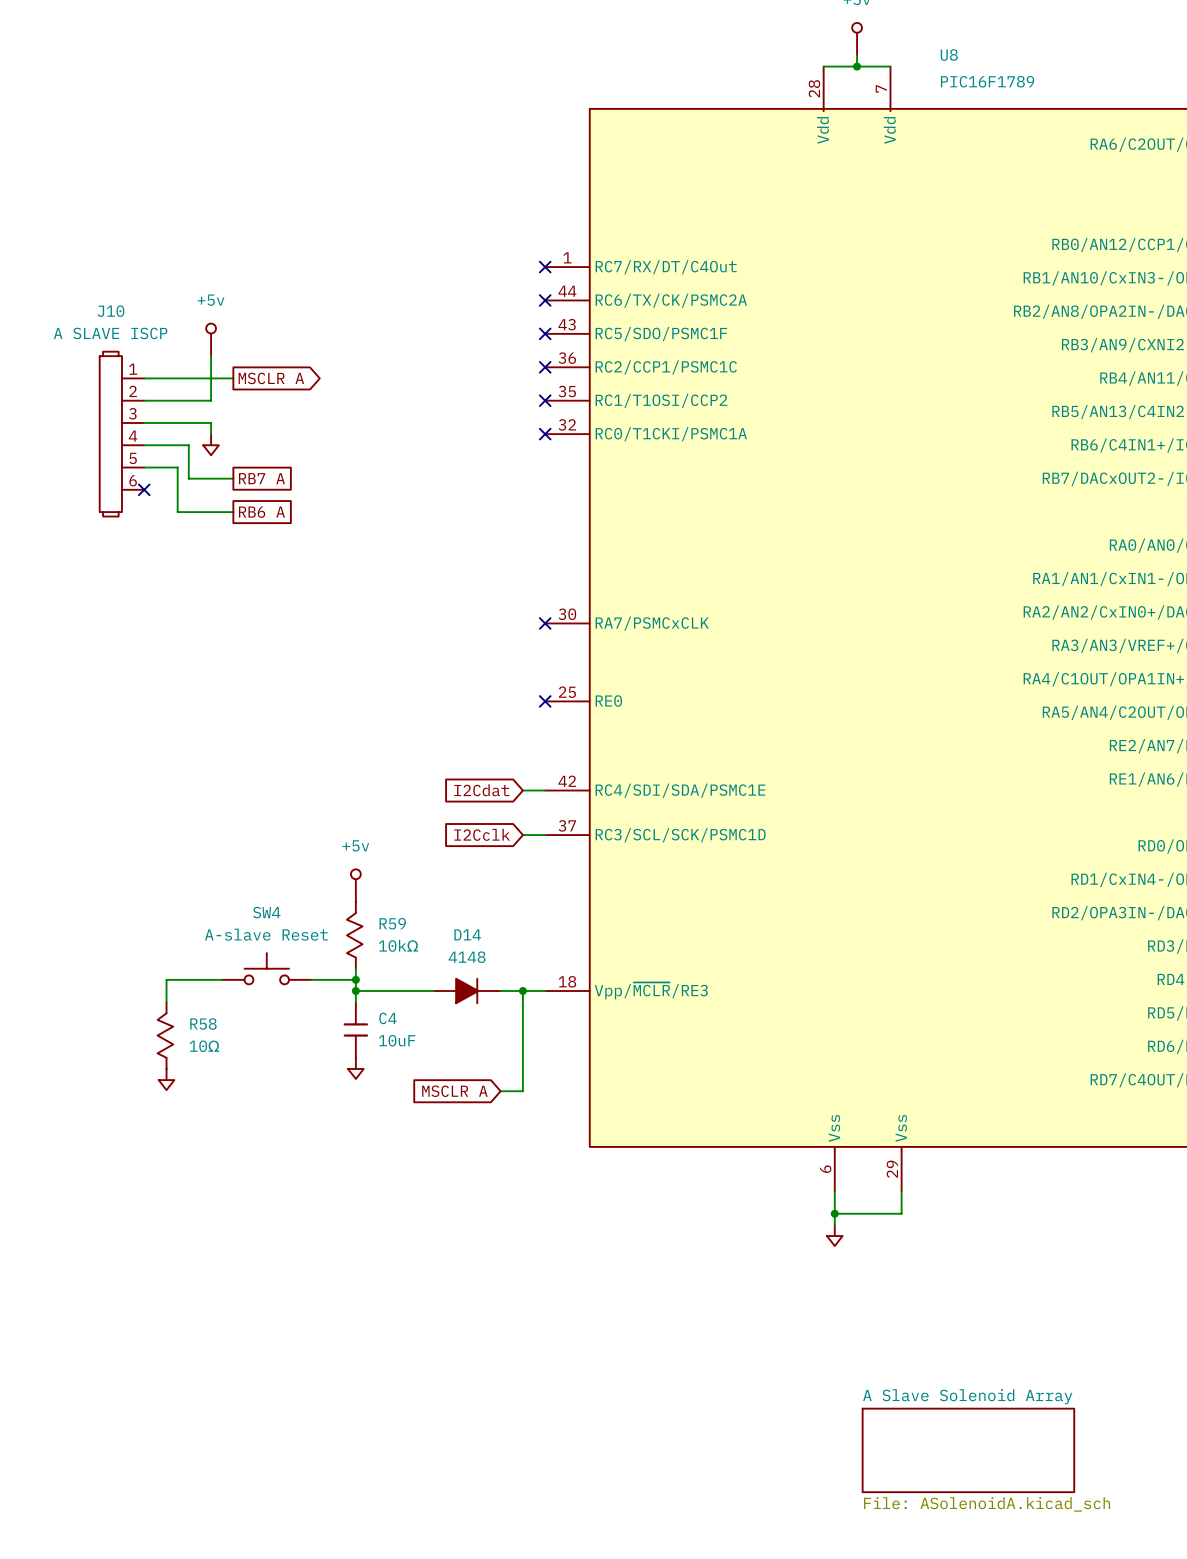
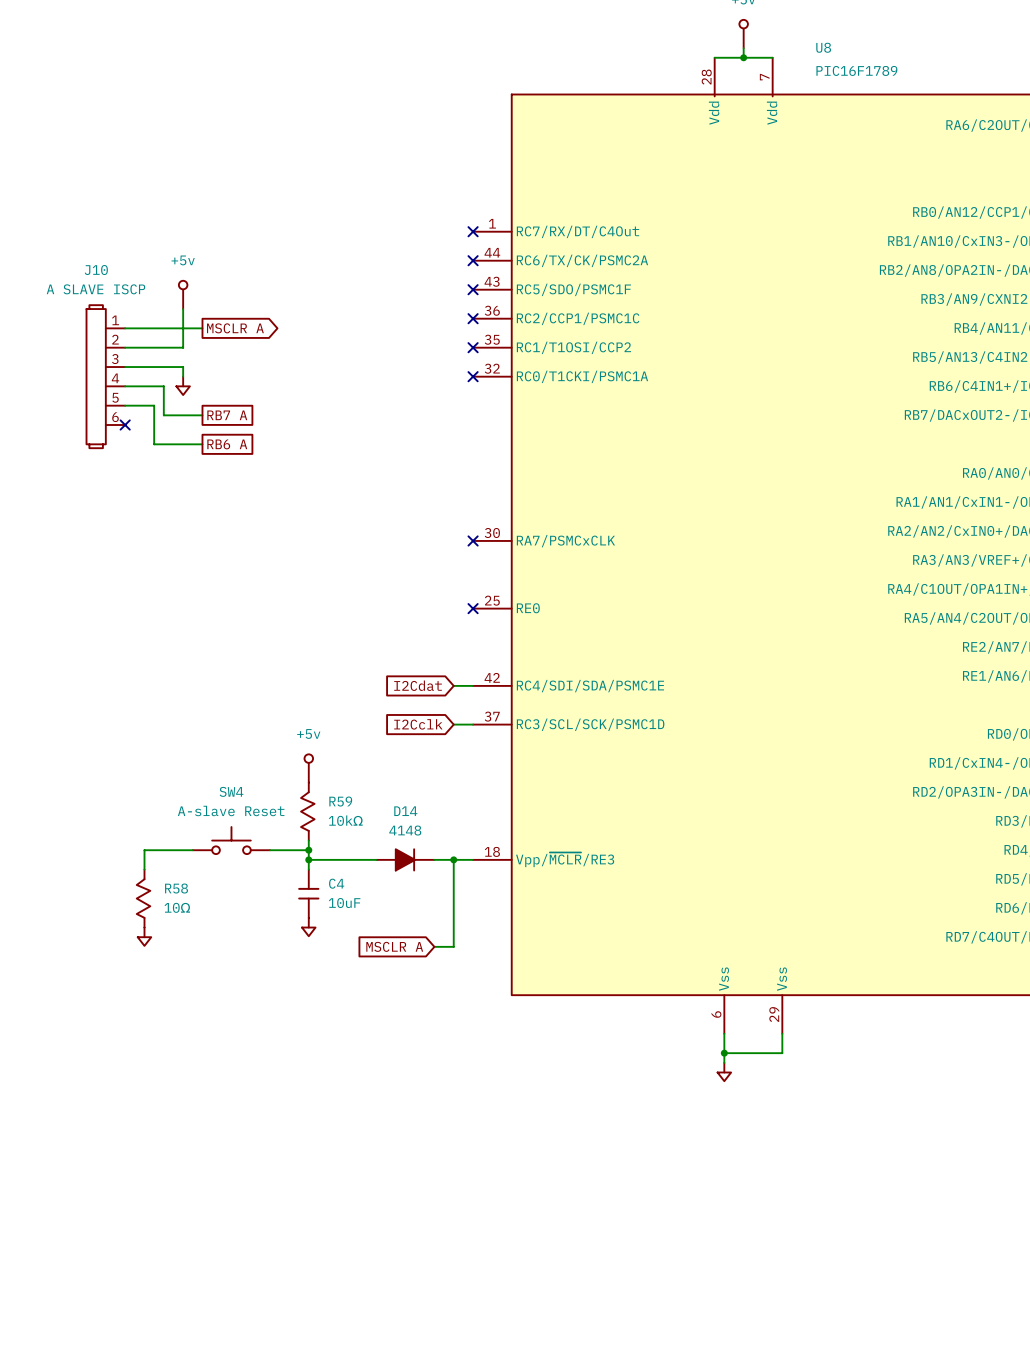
sheet A Slave Solenoid Array: File: ASolenoidA.kicad_sch (968, 1450) -> none

